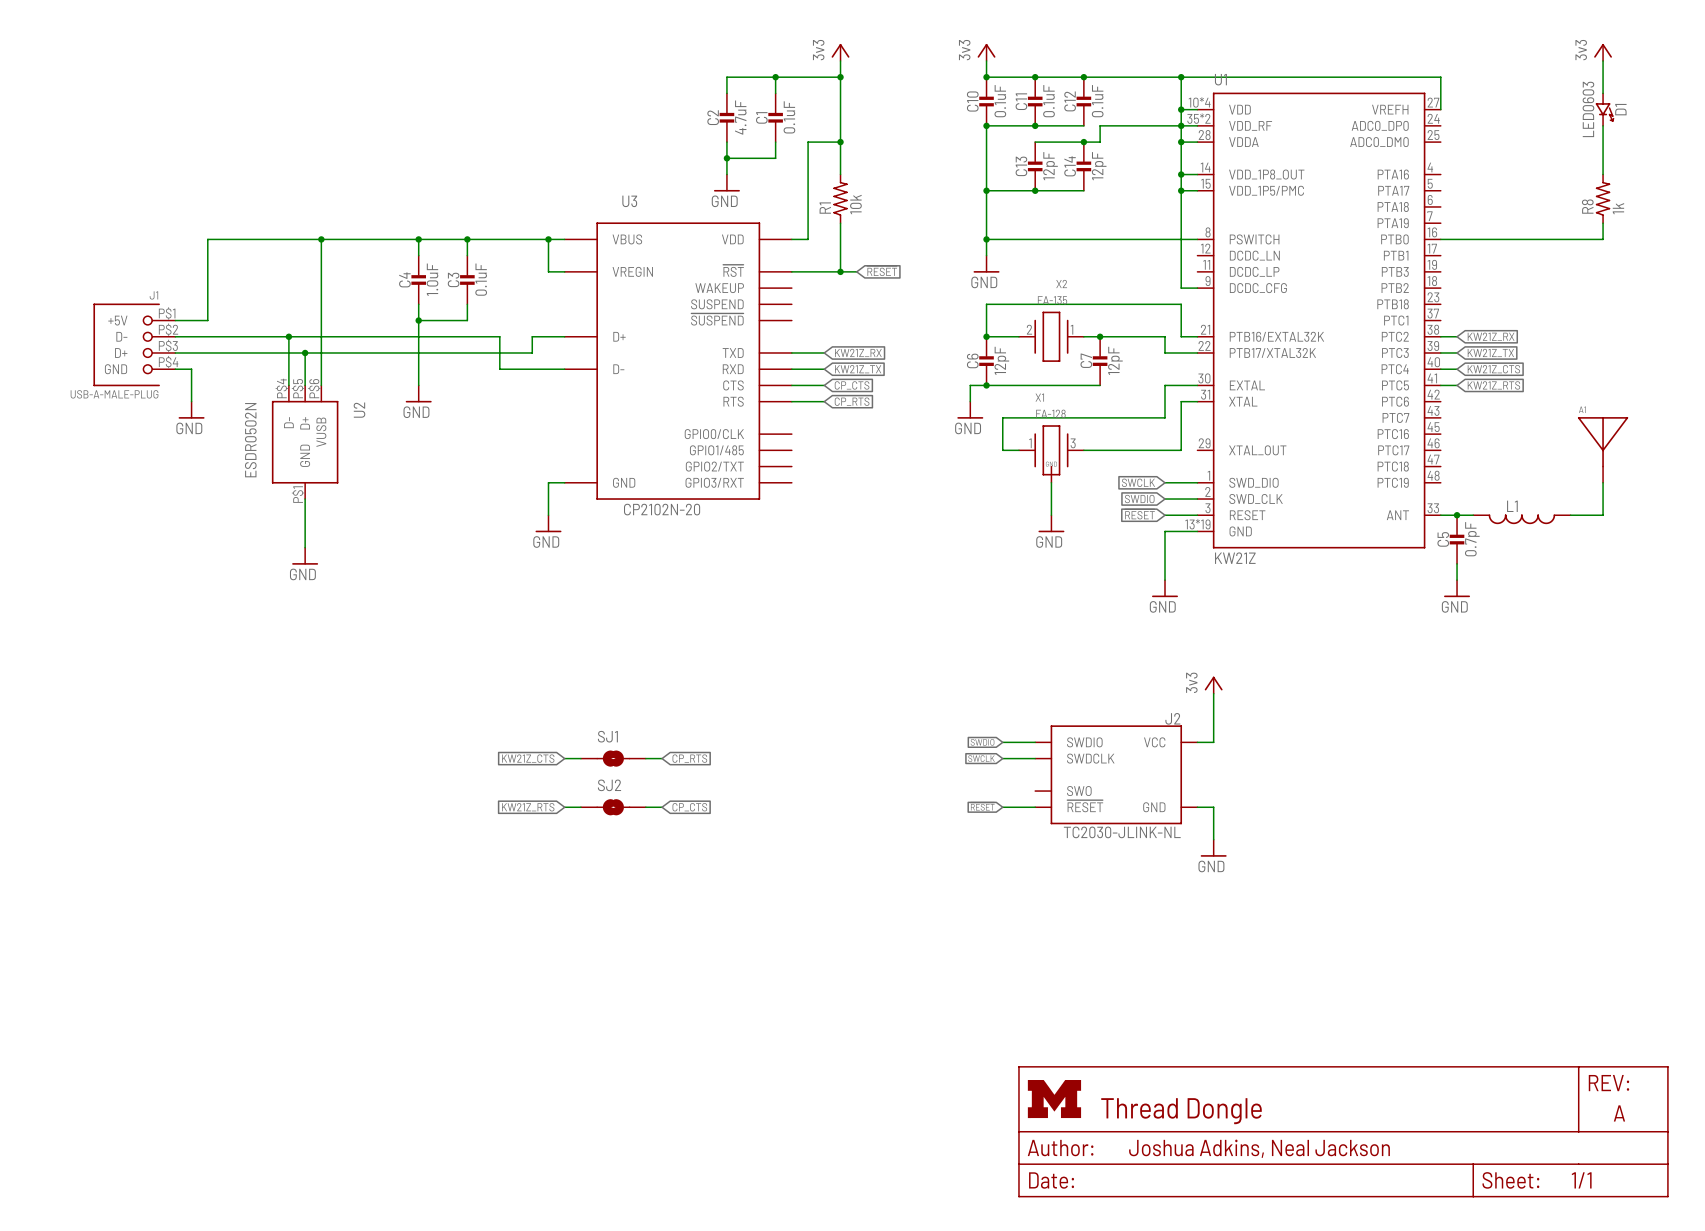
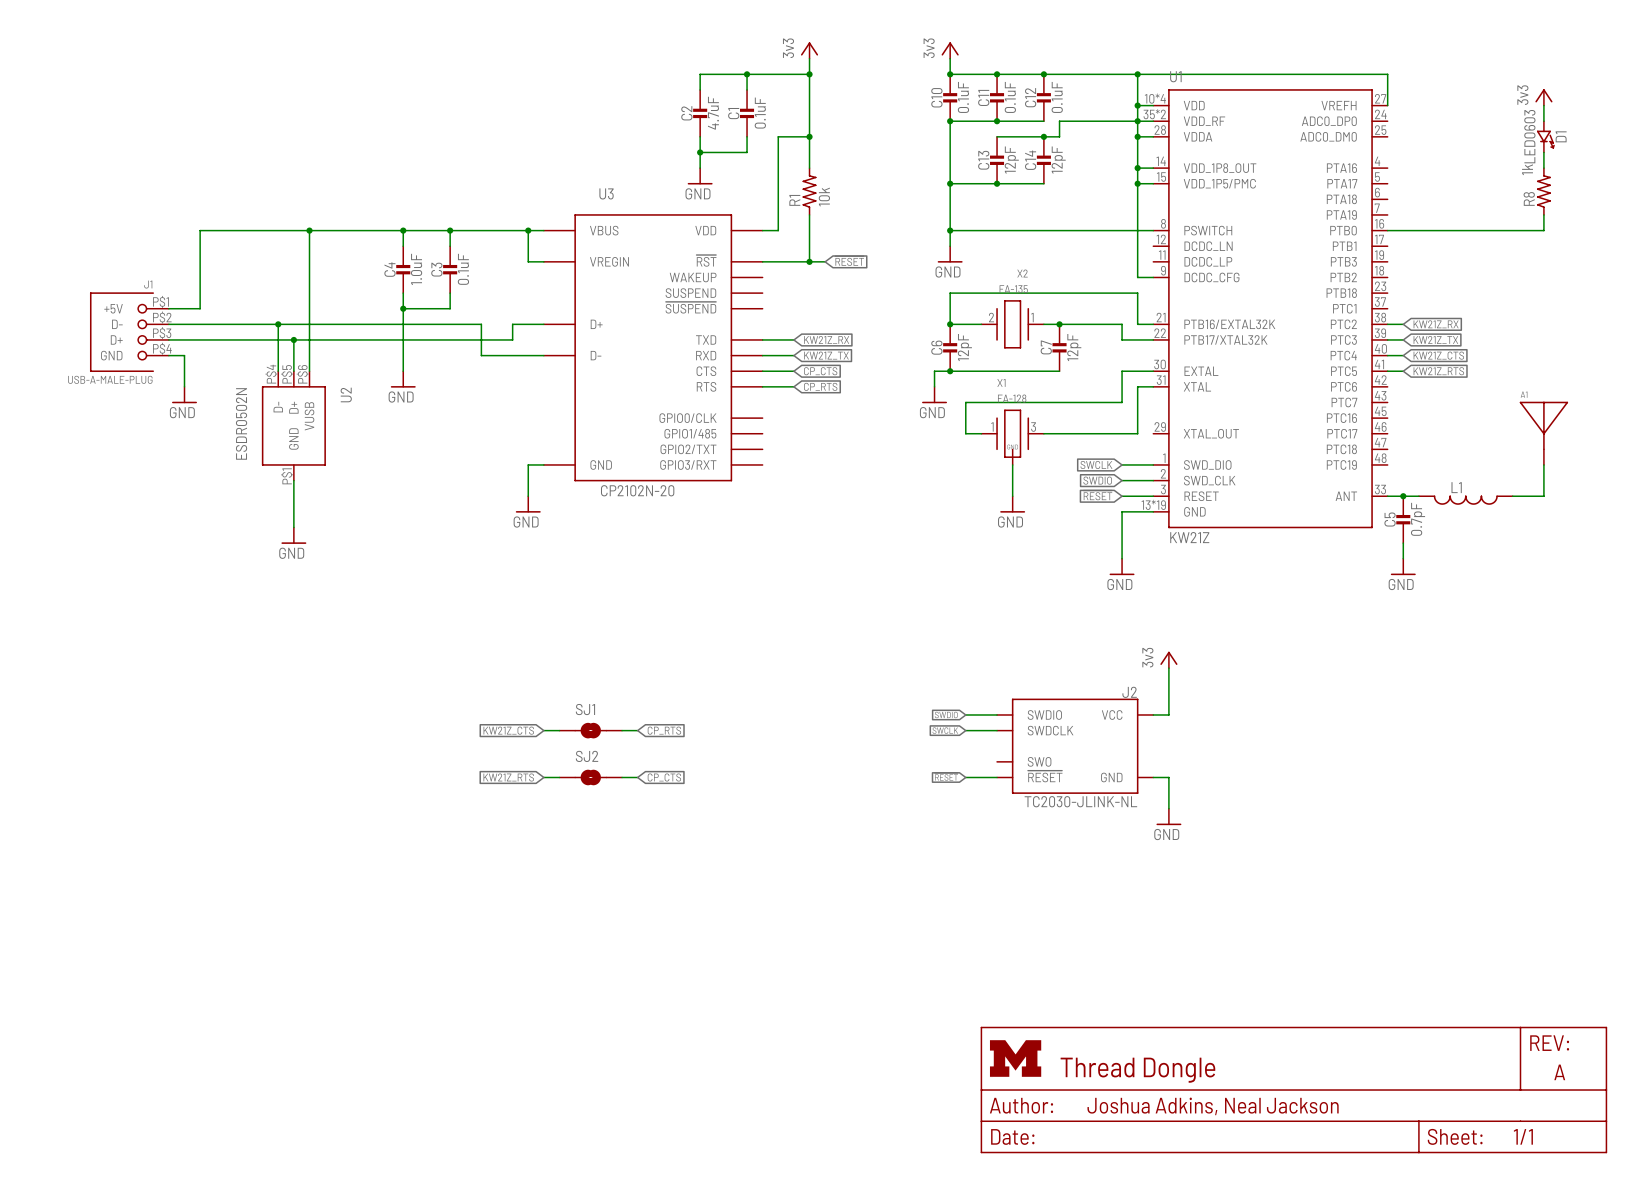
power symbol position: 3v3 (1603, 52) -> 3v3 (1543, 97)
wire: (1603, 60) (1603, 93) -> none
D1 position: (1604, 109) -> (1545, 136)
R8 value position: 1k (1618, 208) -> 1k (1527, 169)

